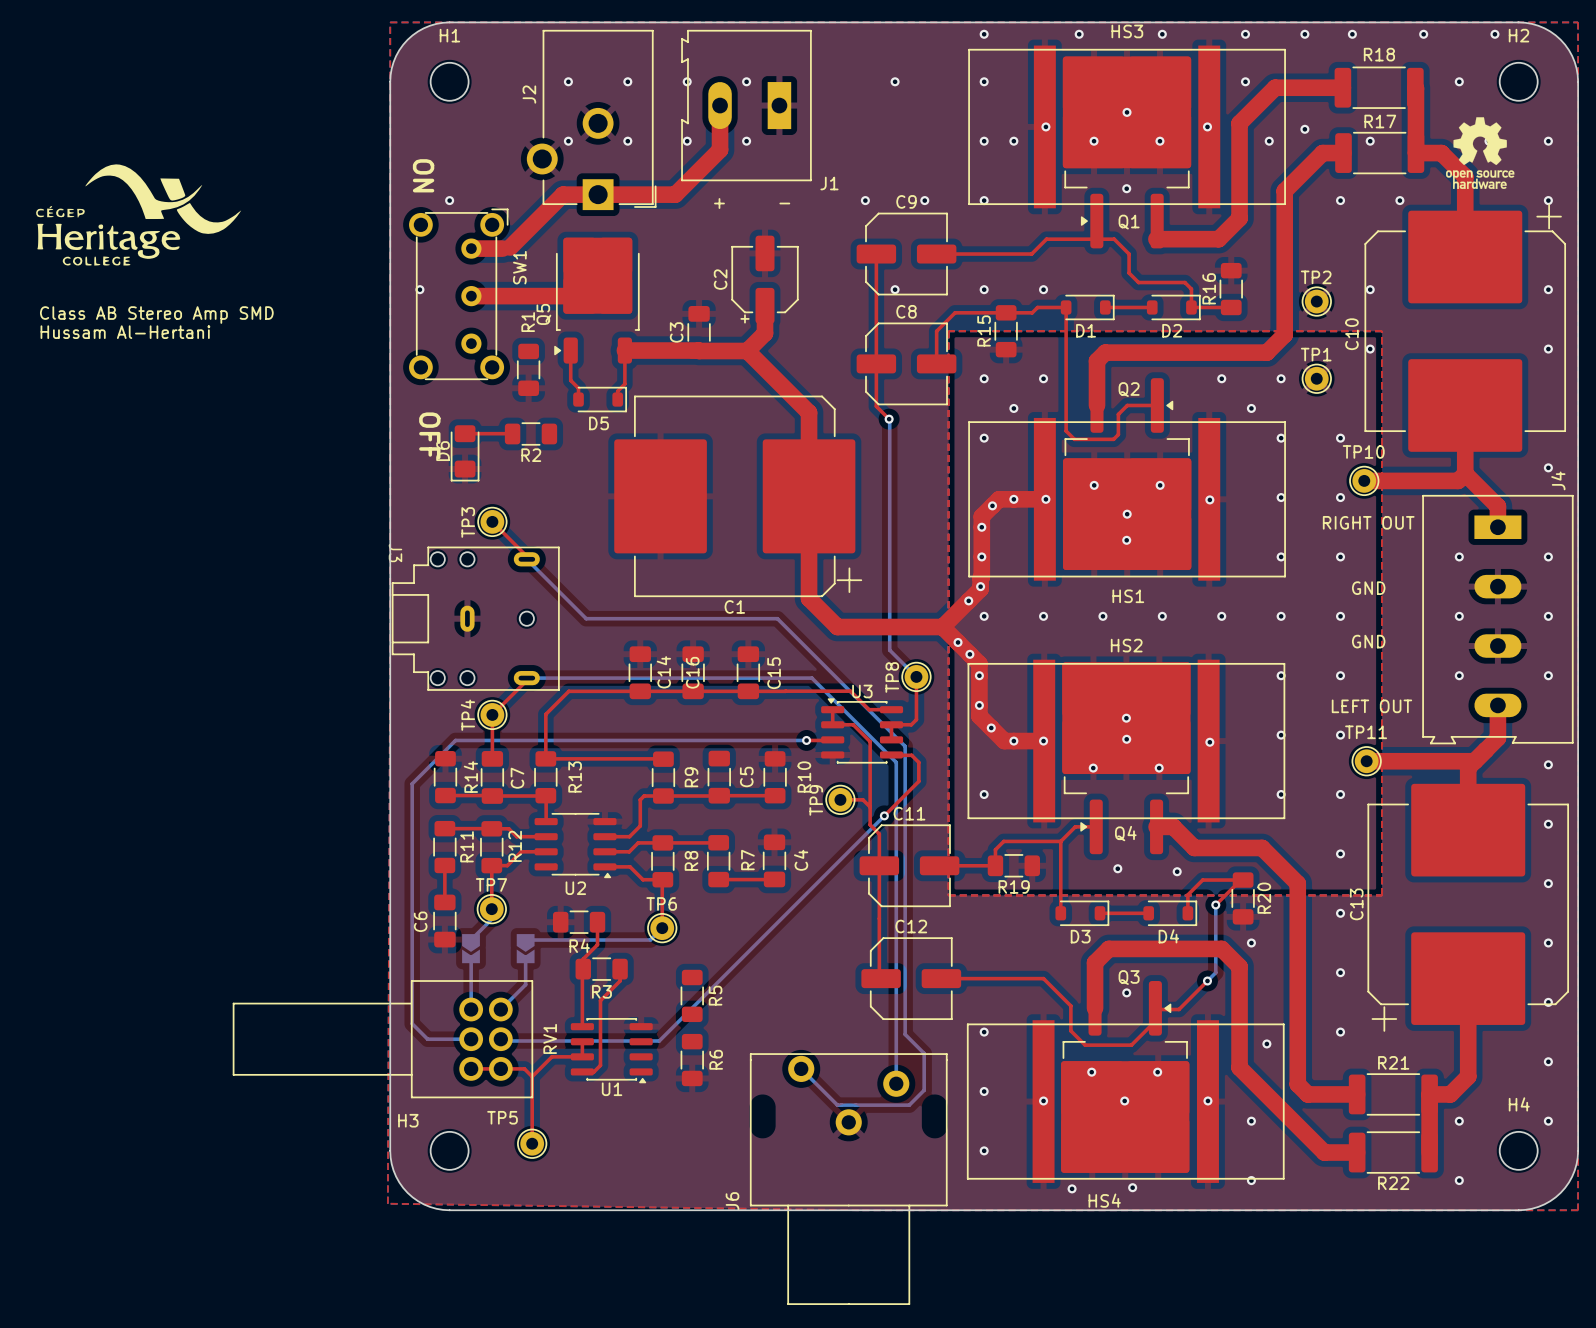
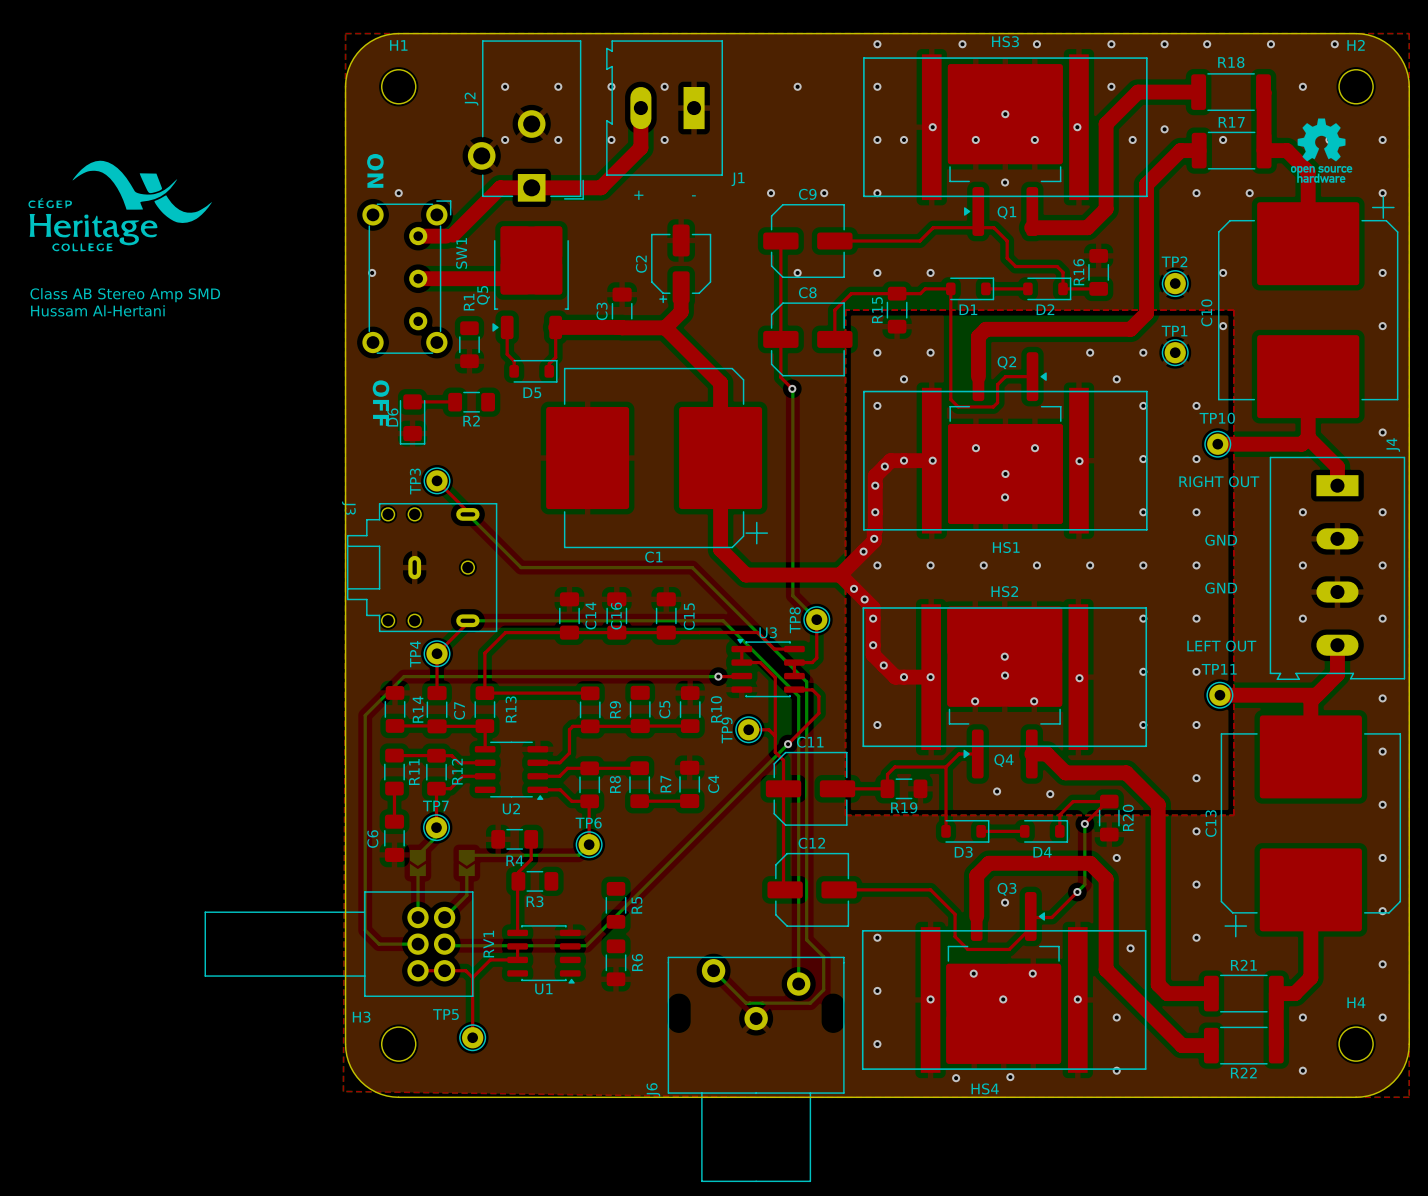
top track: (620, 969) (620, 981) (600, 1000) (600, 1065) (593, 1071) (582, 1071) -> none

